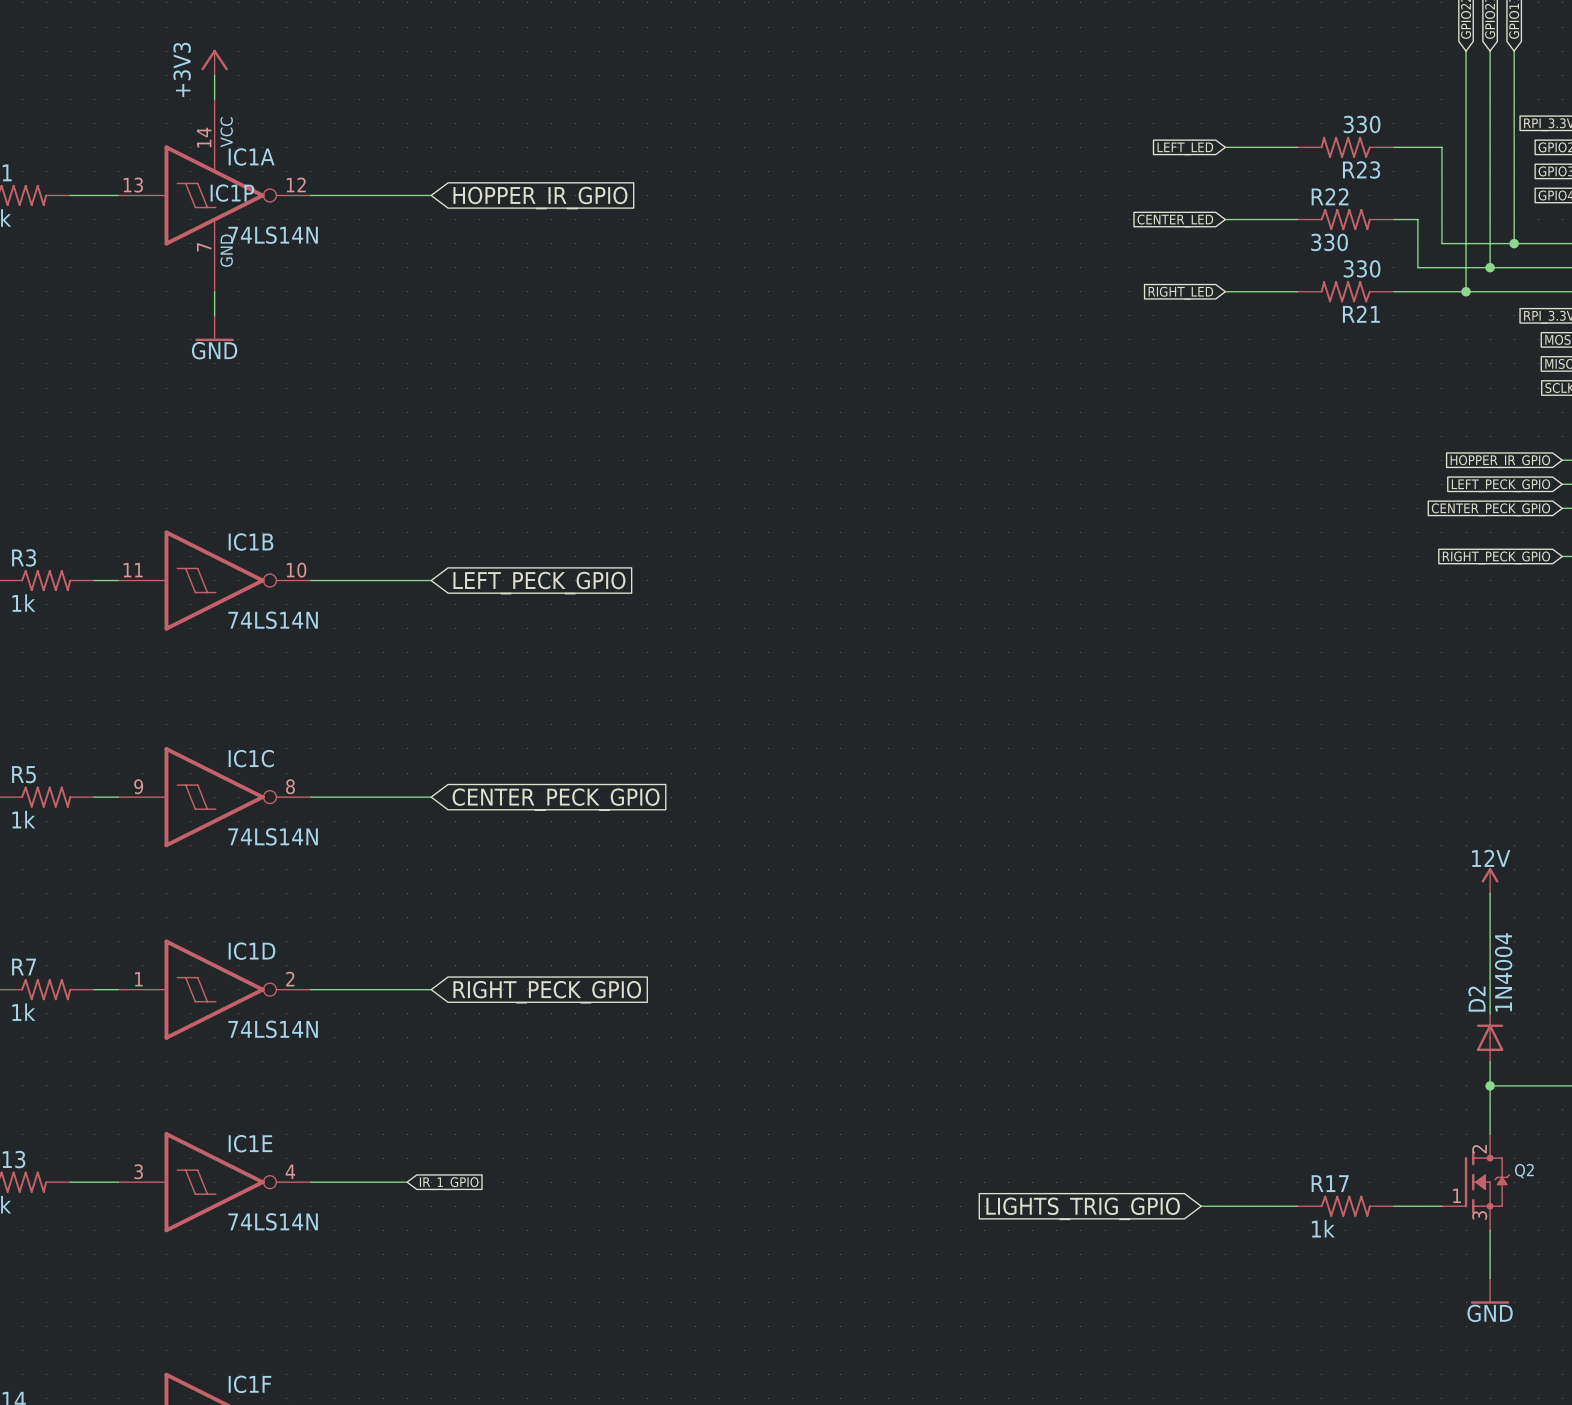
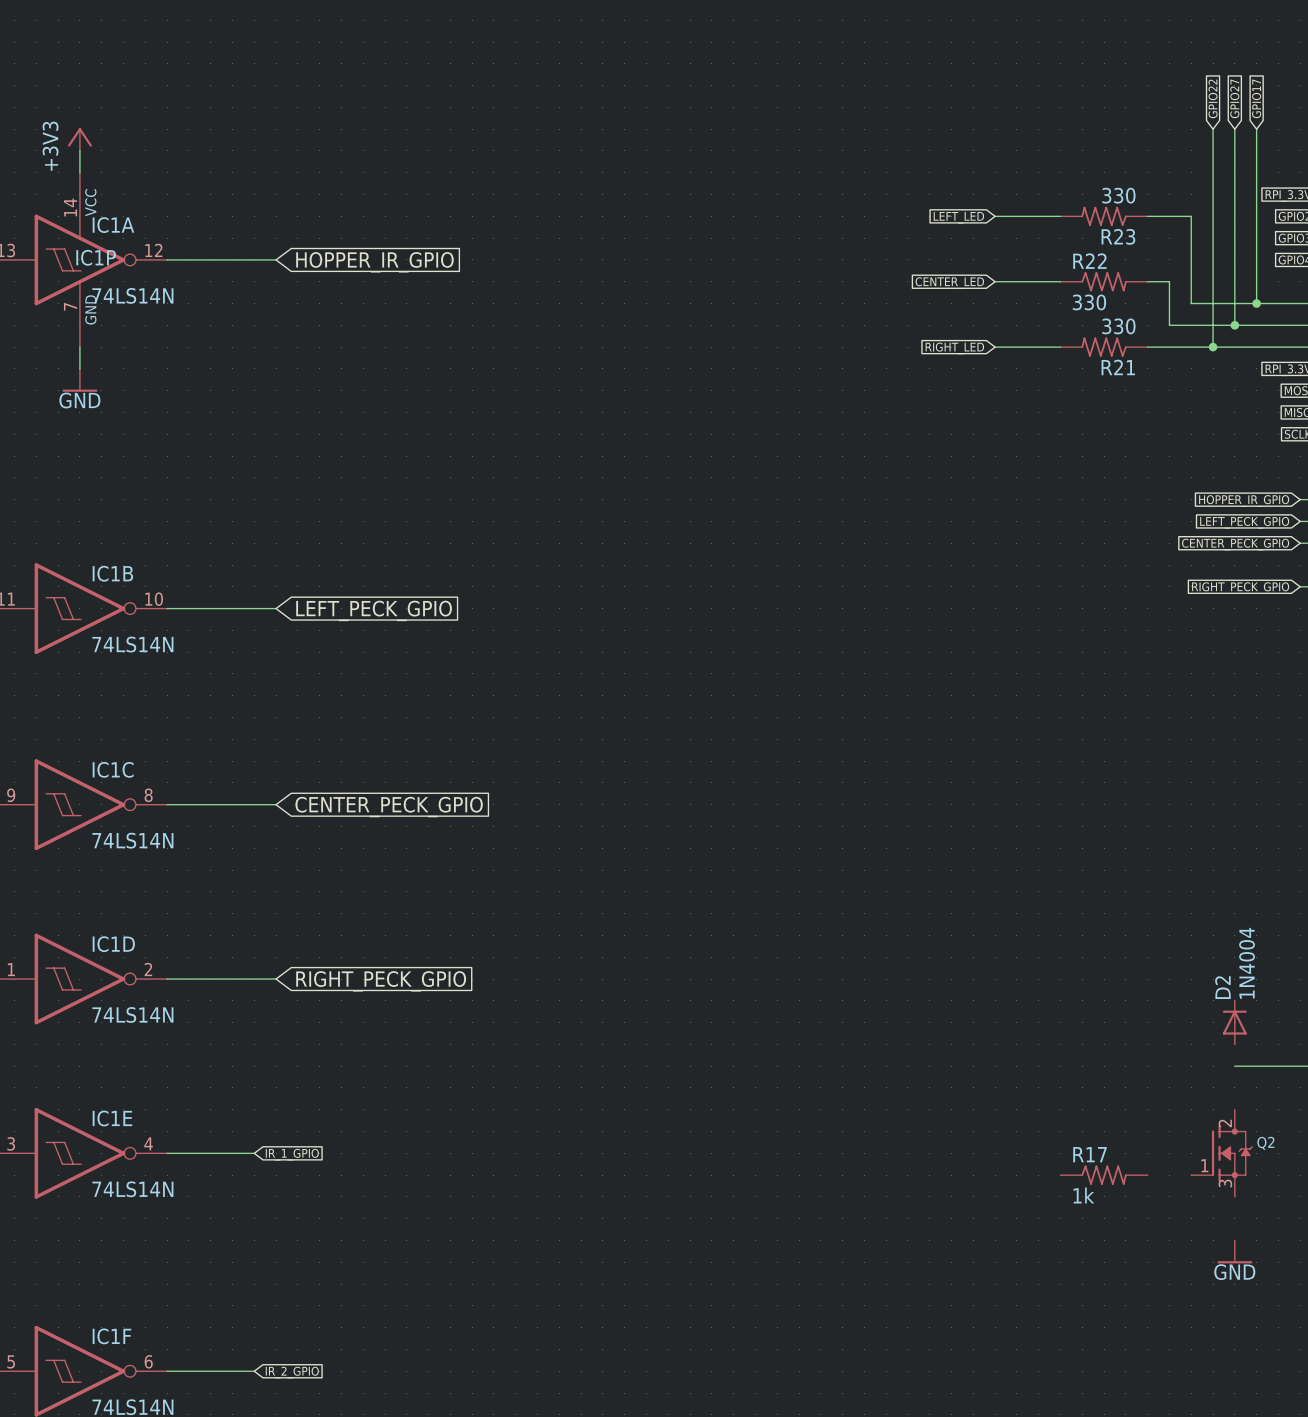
power symbol: 12V (1490, 880) -> none
wire: (1490, 893) (1490, 1013) -> none
wire: (1490, 1061) (1490, 1134) -> none
junction: (1490, 1085) -> none
wire: (1201, 1206) (1297, 1206) -> none
wire: (1393, 1206) (1441, 1206) -> none
global label: LIGHTS_TRIG_GPIO (1083, 1208) -> none
wire: (1490, 1230) (1490, 1278) -> none

